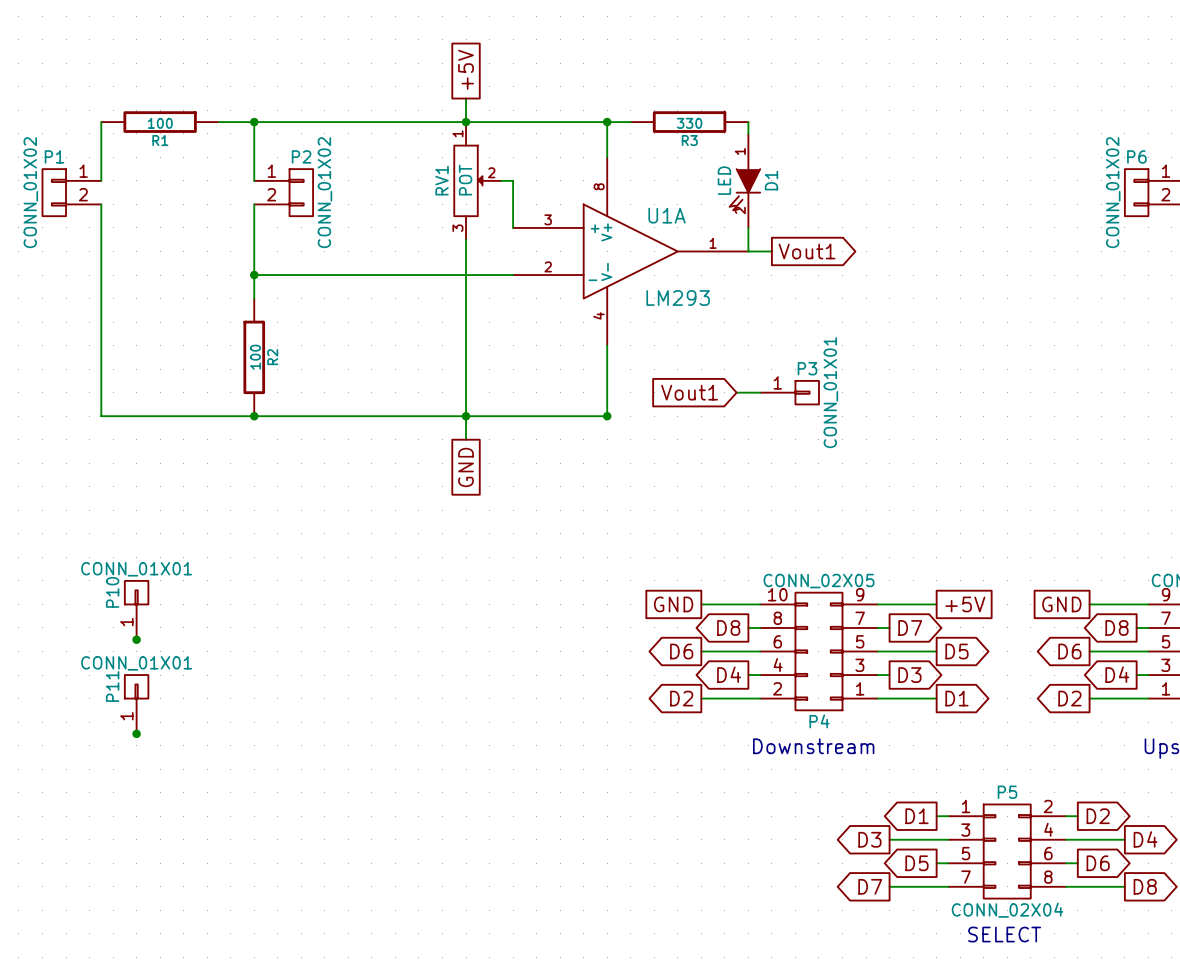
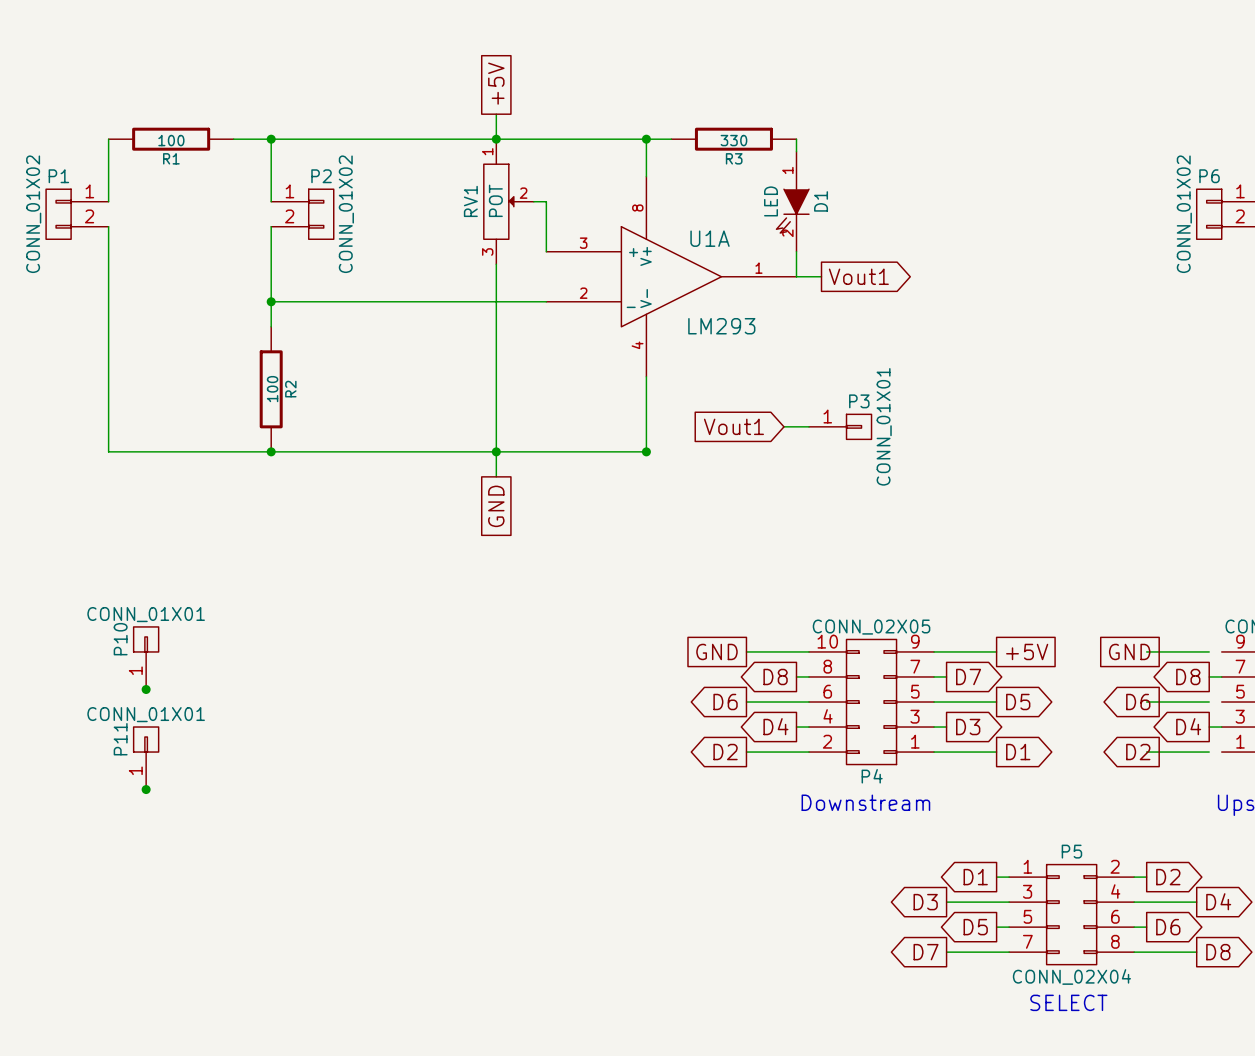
wire: (1136, 604) (1148, 604) -> (1146, 651) (1159, 651)
wire: (1136, 651) (1148, 651) -> (1146, 702) (1159, 702)
wire: (1136, 698) (1148, 698) -> (1146, 752) (1159, 752)

